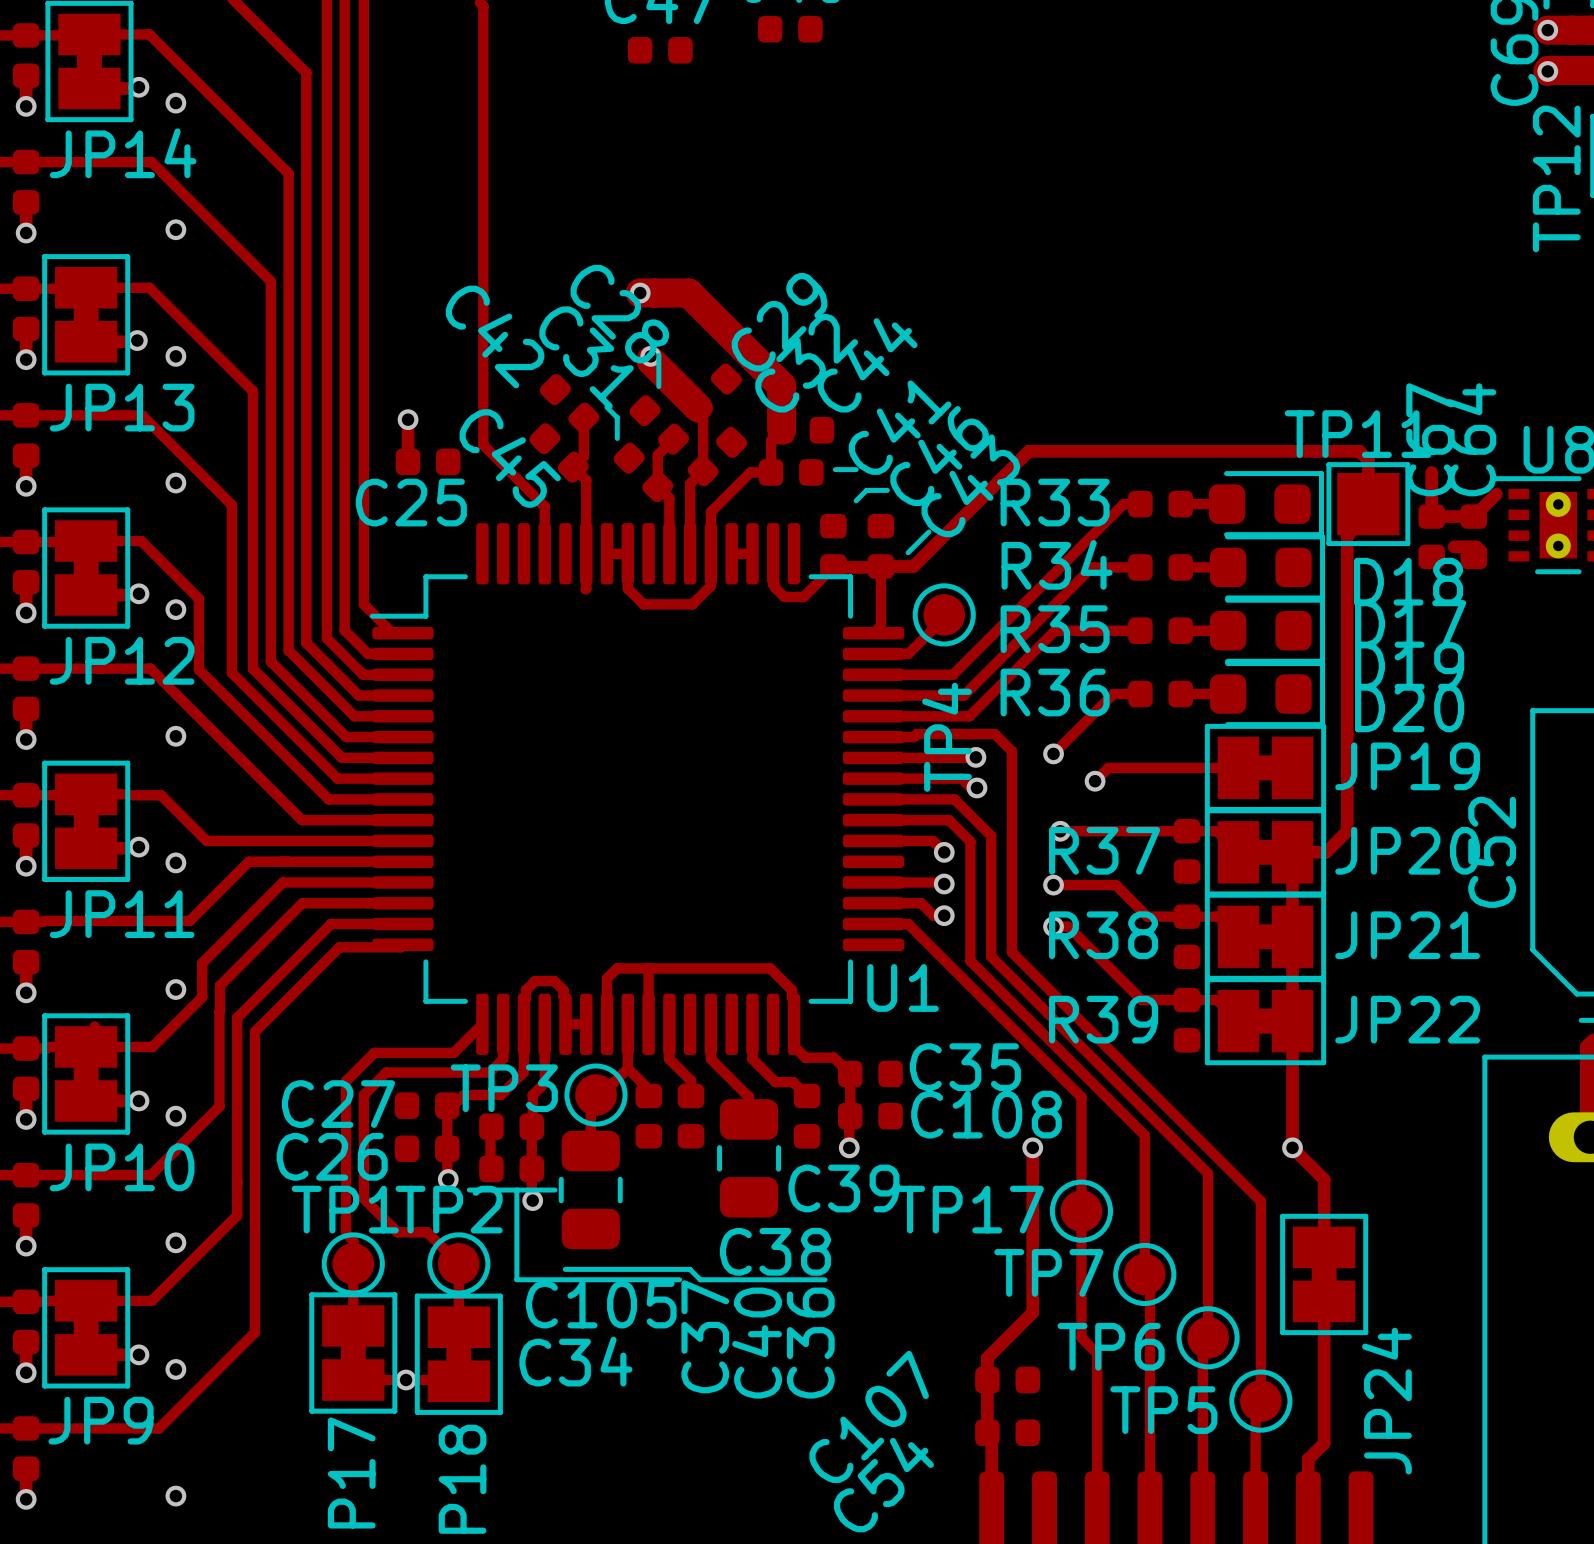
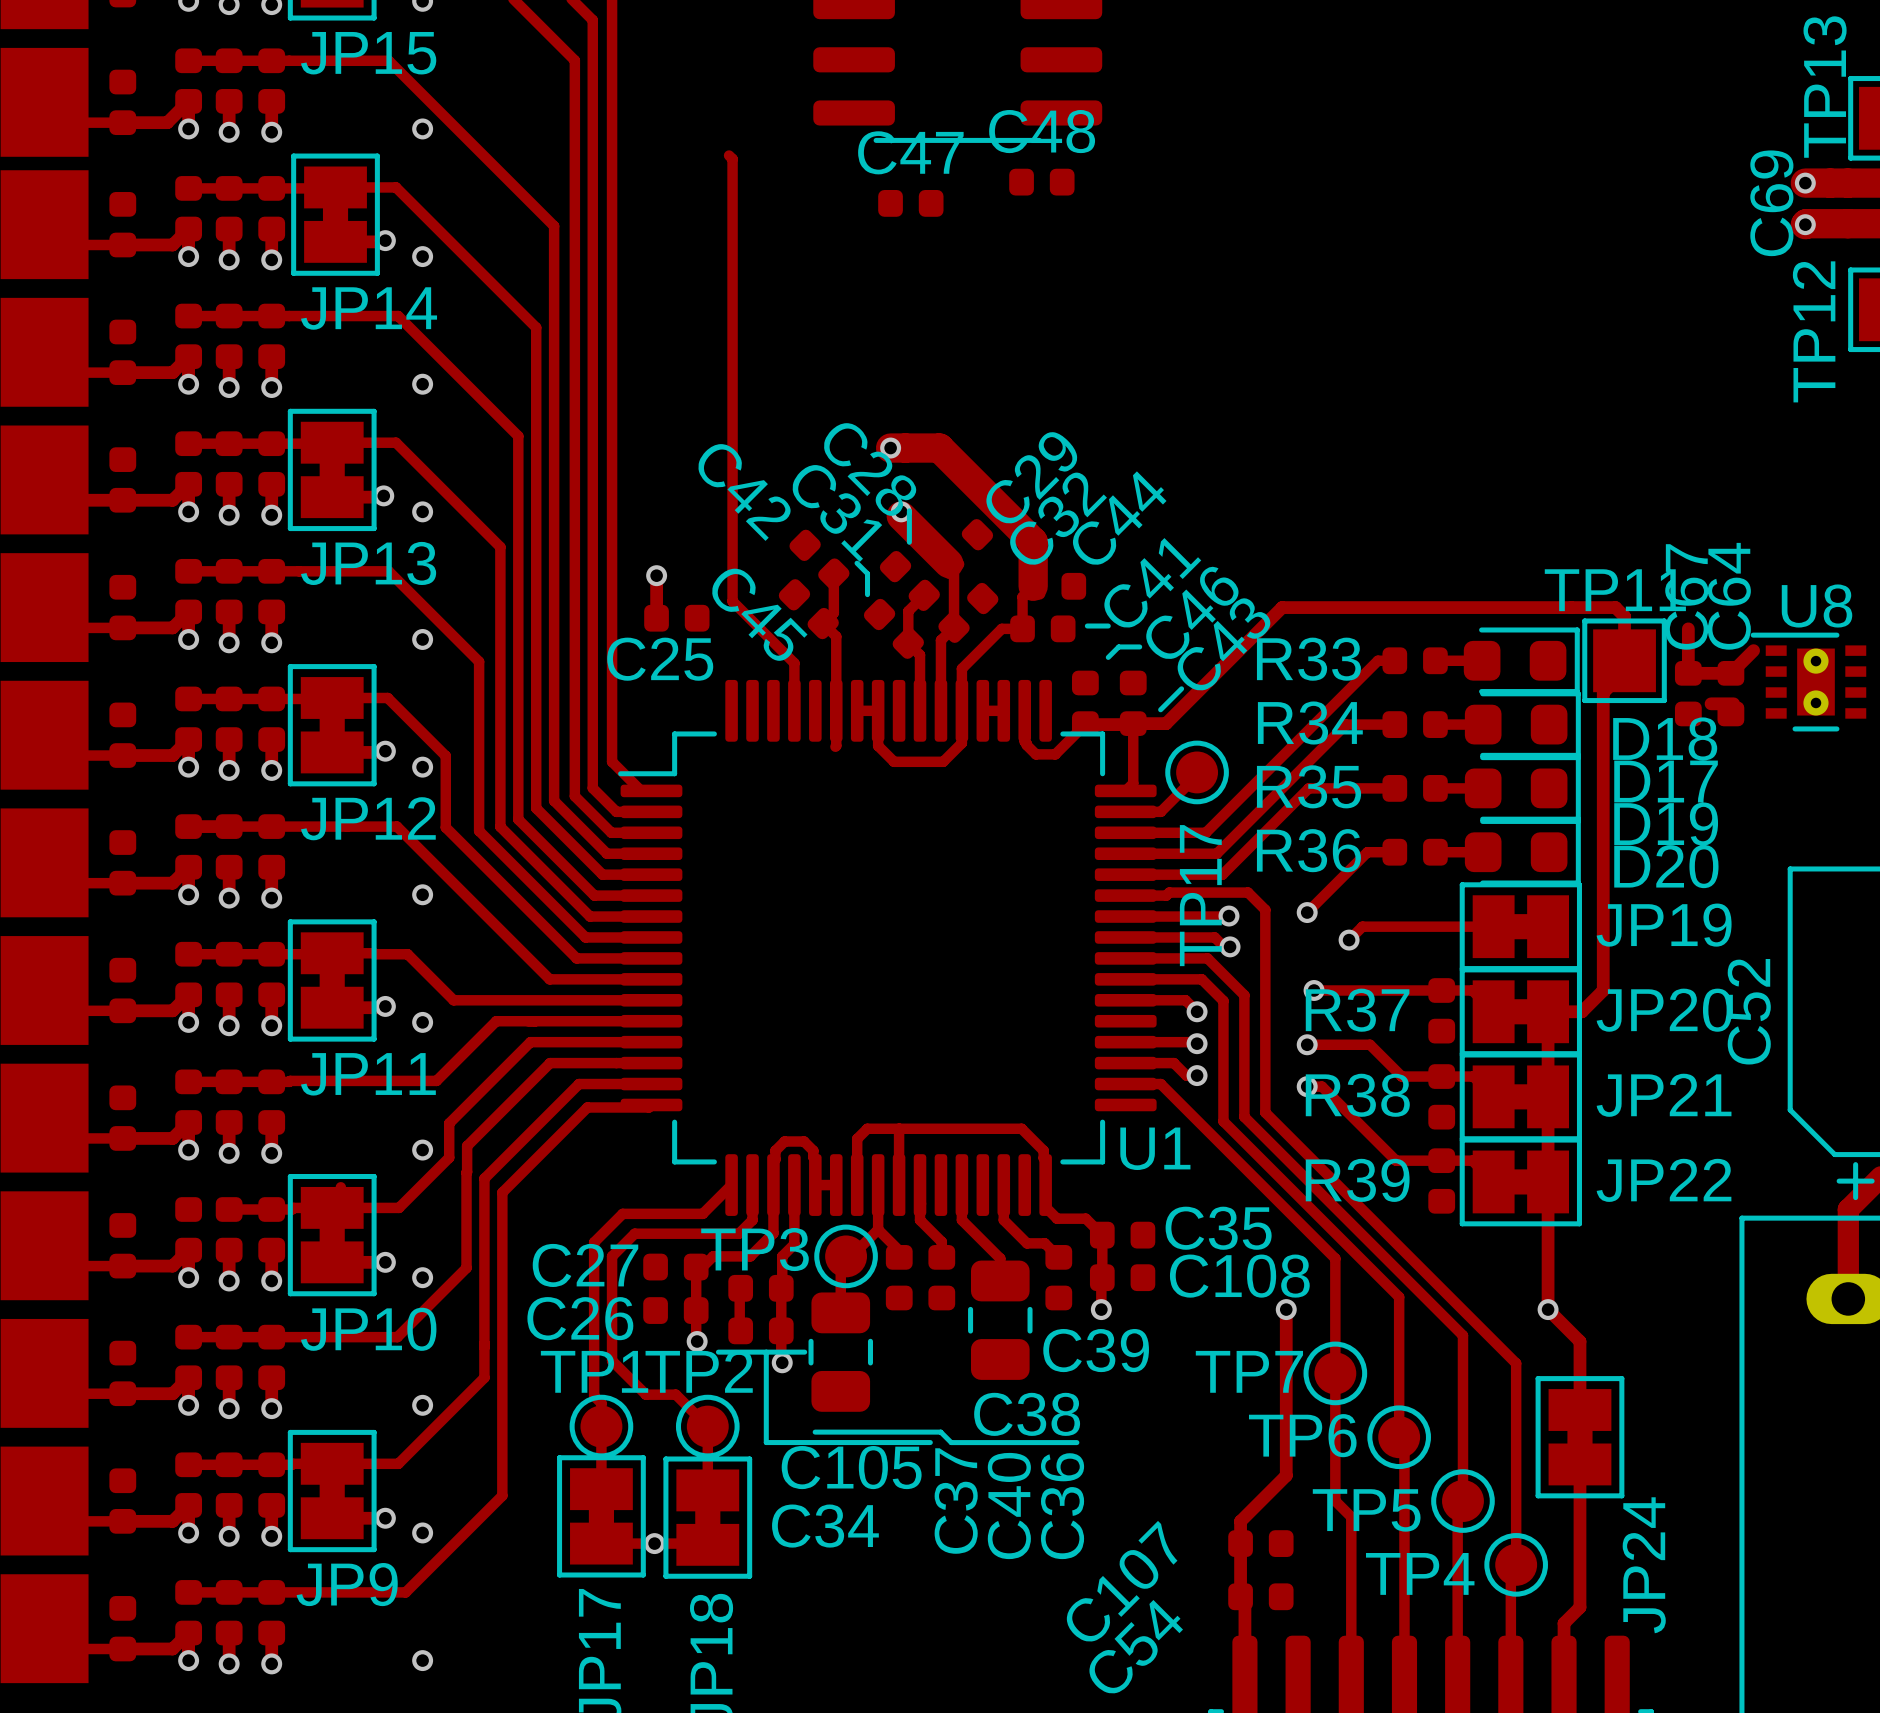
TP4 name: TP4 (946, 737) -> TP17 (1200, 895)
TP17 name: TP17 (969, 1209) -> TP7 (1249, 1371)
TP7 name: TP7 (1048, 1272) -> TP6 (1302, 1435)
TP6 name: TP6 (1111, 1346) -> TP5 (1366, 1510)
TP5 name: TP5 (1163, 1410) -> TP4 (1420, 1573)

